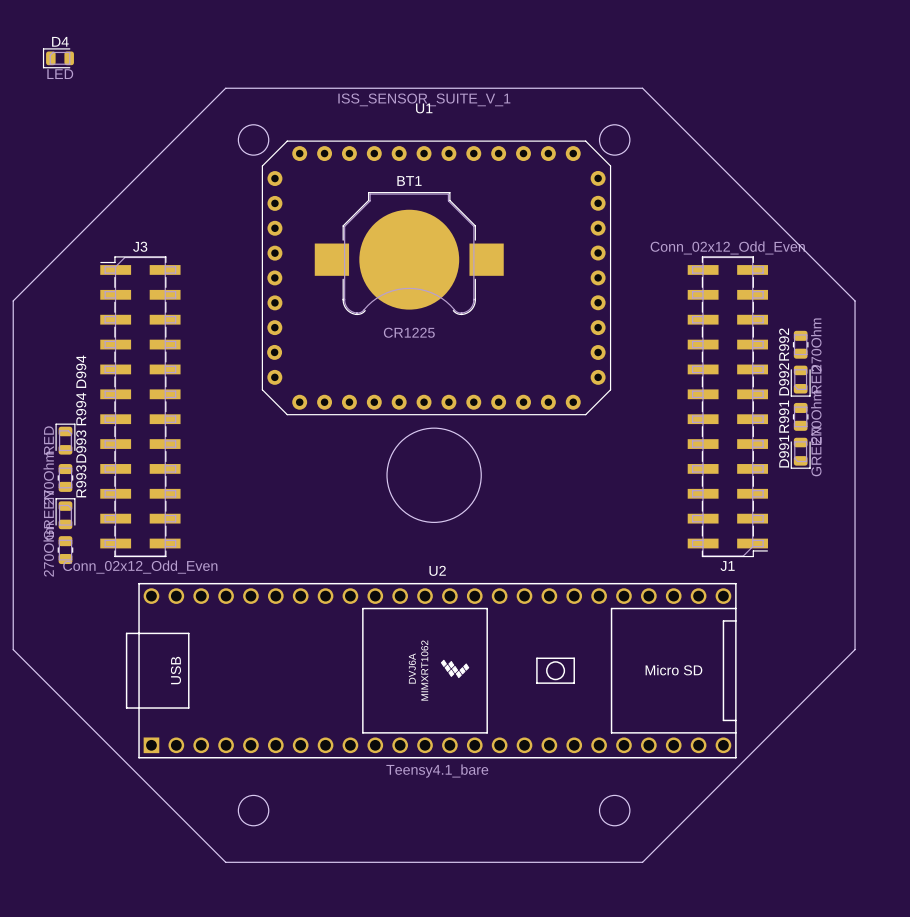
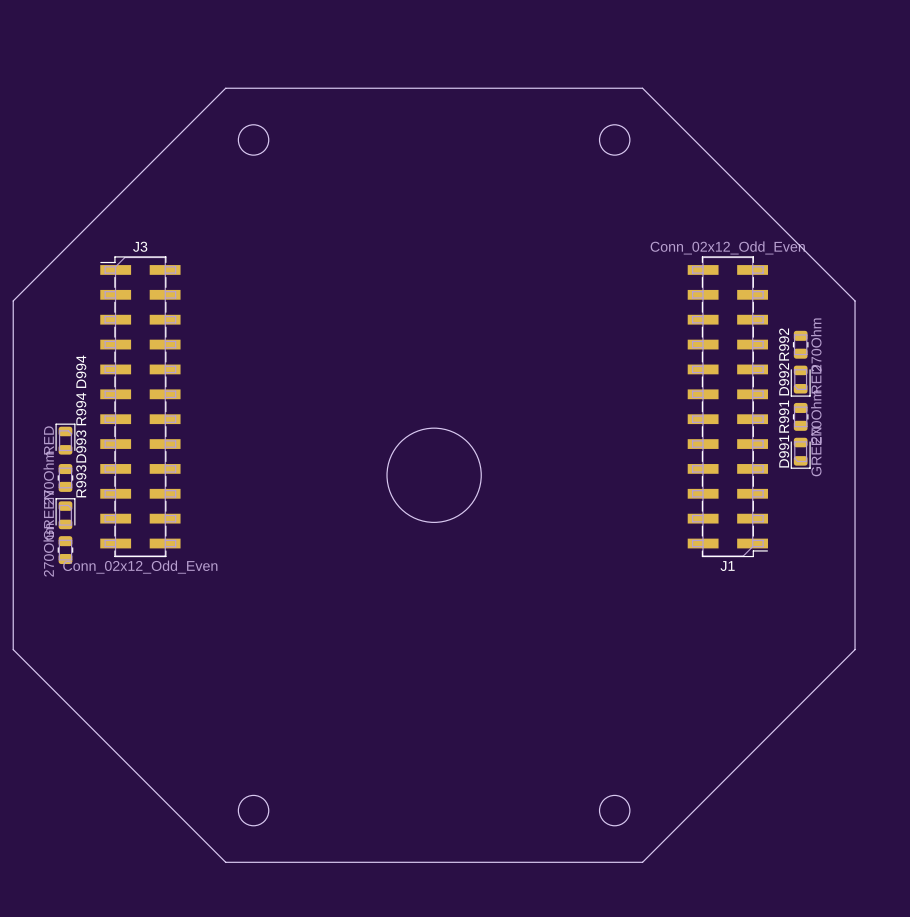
D4: LED (58, 58) -> none
BT1: CR1225 (409, 253) -> none
U1: ISS_SENSOR_SUITE_V_1 (436, 277) -> none
U2: Teensy4.1_bare (431, 670) -> none

